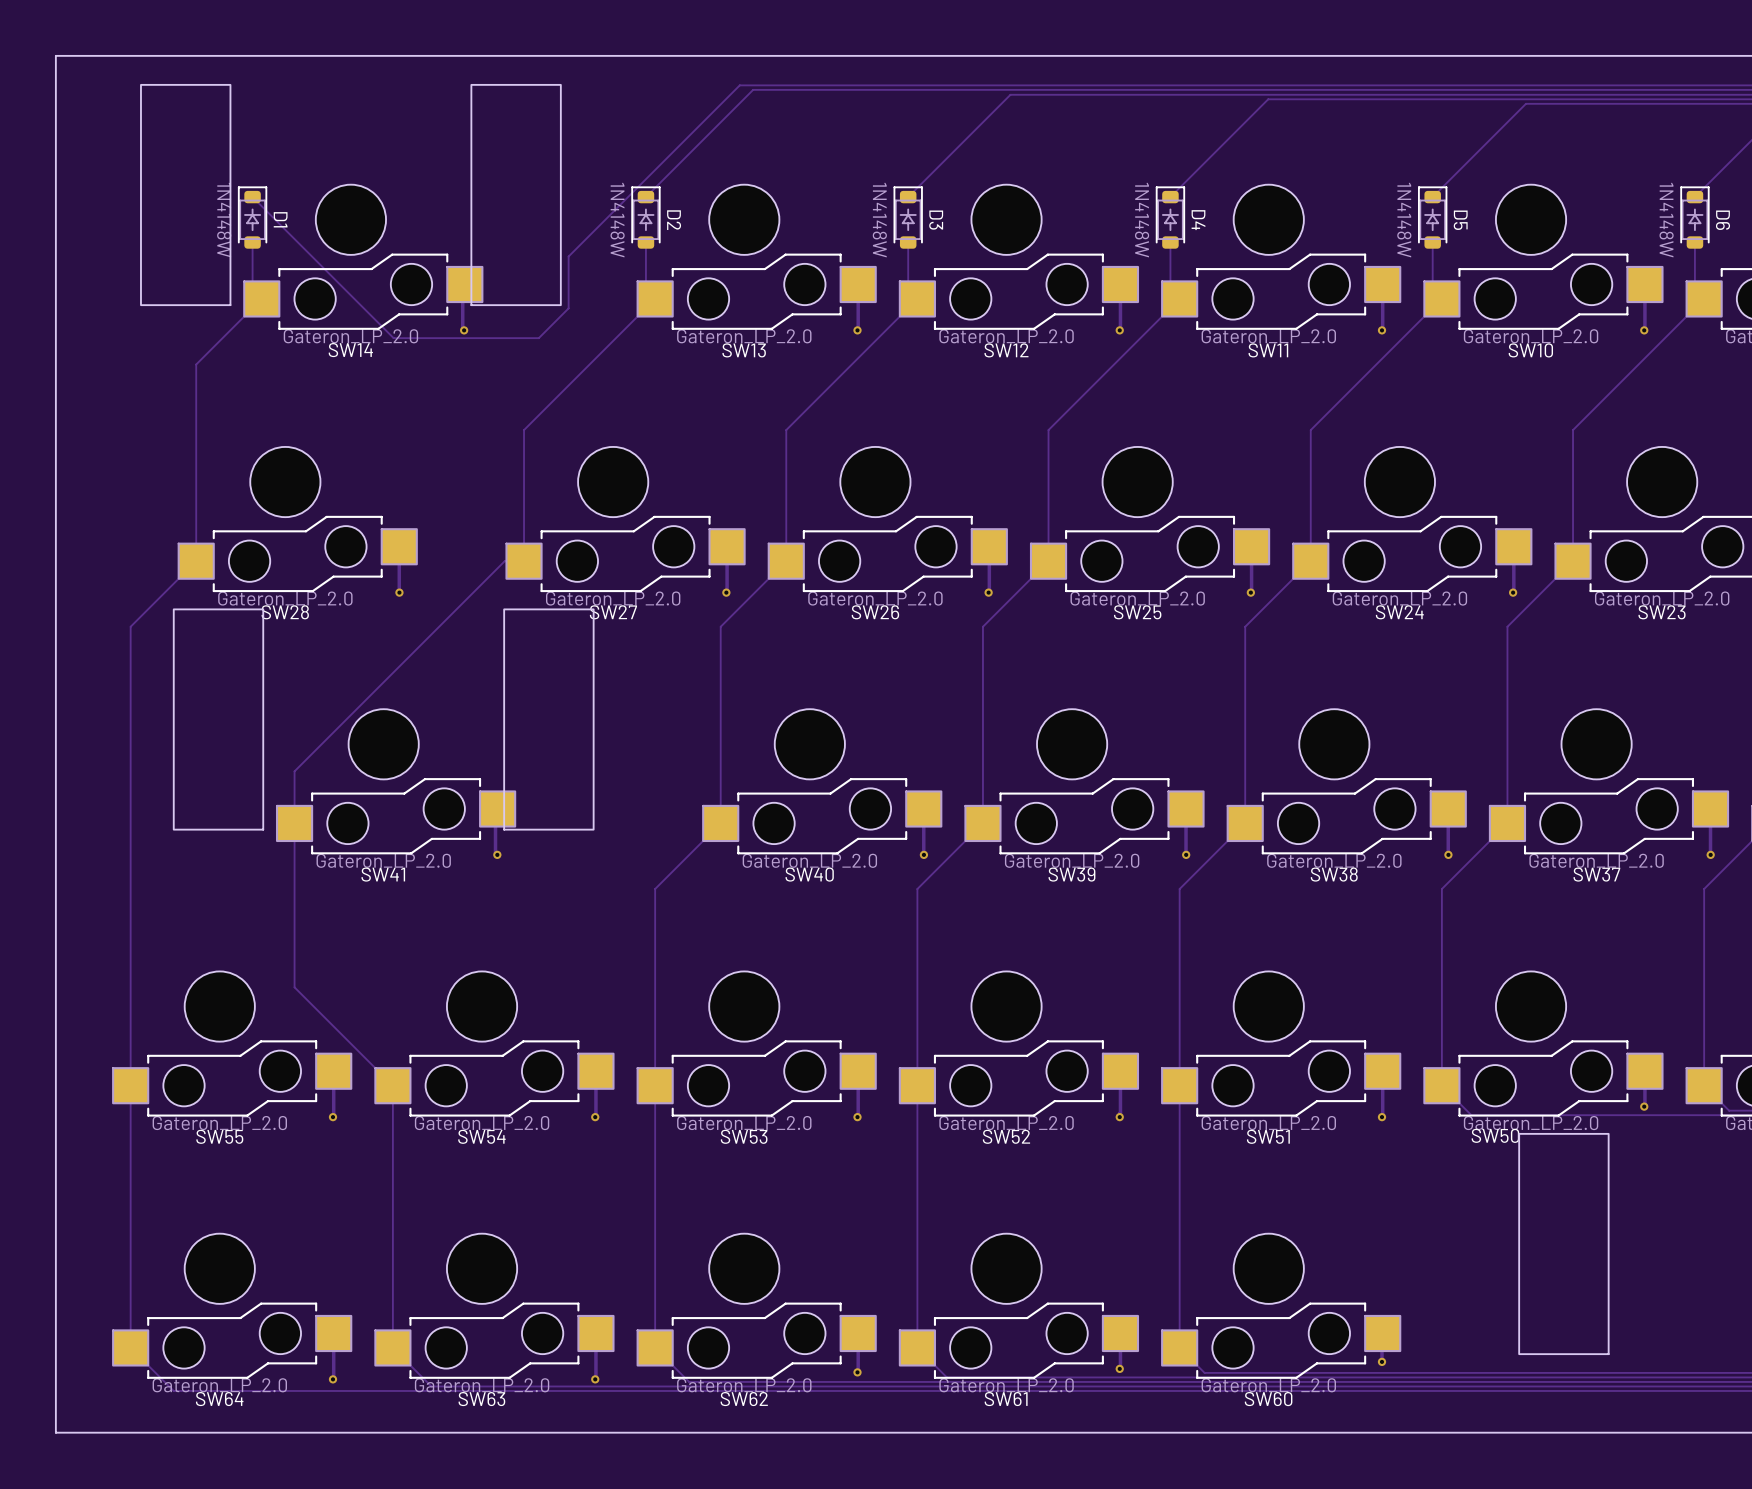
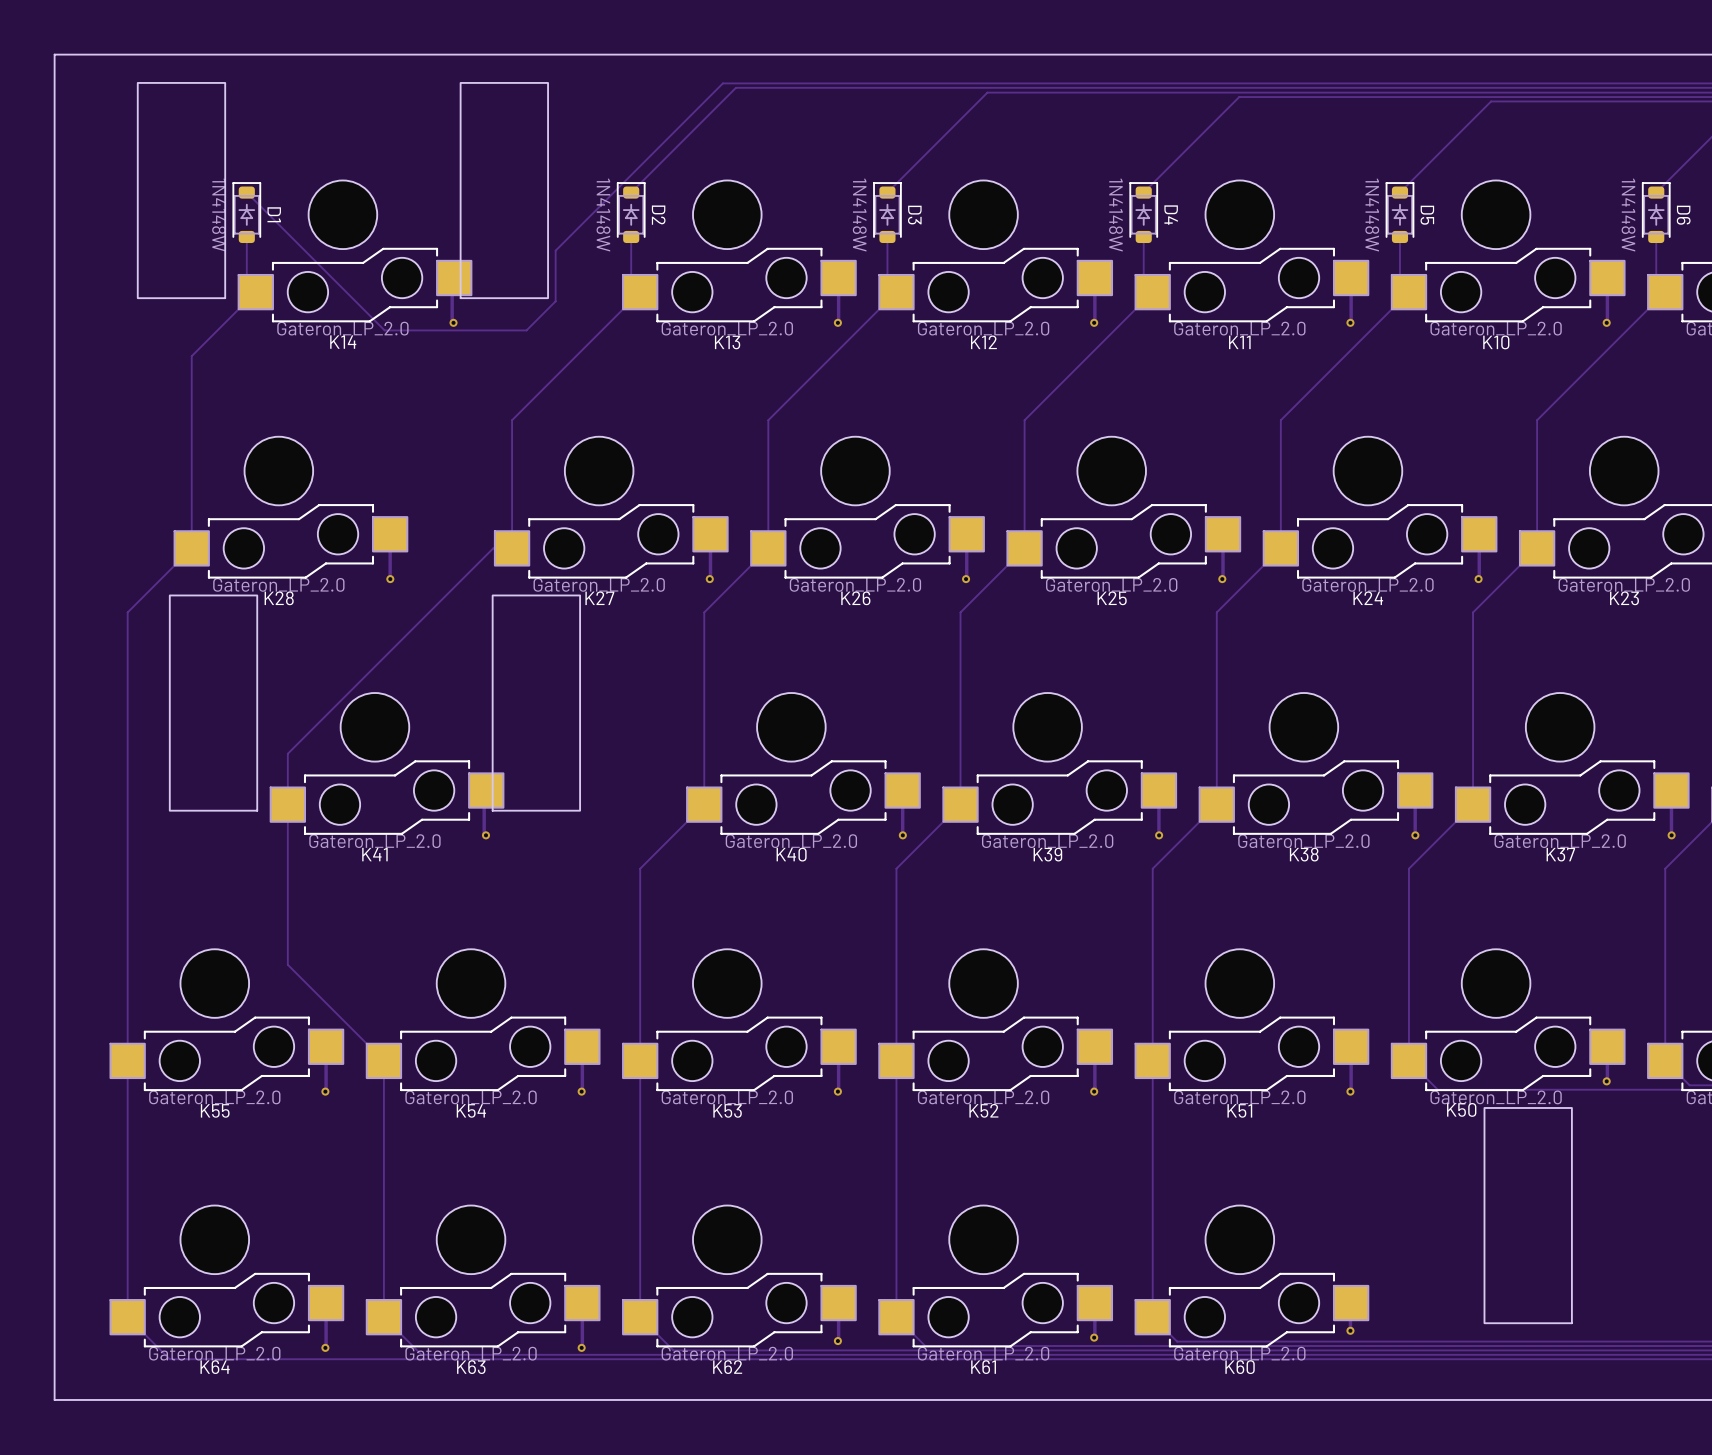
SW14 name: SW14 (350, 350) -> K14 (343, 342)
SW13 name: SW13 (744, 350) -> K13 (727, 342)
SW12 name: SW12 (1006, 350) -> K12 (983, 342)
SW11 name: SW11 (1268, 350) -> K11 (1239, 342)
SW10 name: SW10 (1530, 350) -> K10 (1496, 342)
SW28 name: SW28 (285, 612) -> K28 (279, 598)
SW27 name: SW27 (613, 612) -> K27 (599, 598)
SW26 name: SW26 (875, 612) -> K26 (855, 598)
SW25 name: SW25 (1137, 612) -> K25 (1112, 598)
SW24 name: SW24 (1399, 612) -> K24 (1368, 598)
SW23 name: SW23 (1662, 612) -> K23 (1624, 598)
SW41 name: SW41 (383, 874) -> K41 (374, 854)
SW40 name: SW40 (809, 874) -> K40 (791, 854)
SW39 name: SW39 (1071, 874) -> K39 (1047, 854)
SW38 name: SW38 (1334, 874) -> K38 (1304, 854)
SW37 name: SW37 (1596, 874) -> K37 (1560, 854)
SW50 name: SW50 (1495, 1135) -> K50 (1461, 1109)
SW55 name: SW55 (219, 1136) -> K55 (215, 1110)
SW54 name: SW54 (481, 1136) -> K54 (471, 1110)
SW53 name: SW53 (744, 1136) -> K53 (727, 1110)
SW52 name: SW52 (1006, 1136) -> K52 (983, 1110)
SW51 name: SW51 (1268, 1136) -> K51 (1239, 1110)
SW64 name: SW64 (219, 1399) -> K64 (215, 1367)
SW63 name: SW63 (481, 1399) -> K63 (471, 1367)
SW62 name: SW62 (744, 1399) -> K62 (727, 1367)
SW61 name: SW61 (1006, 1399) -> K61 (983, 1367)
SW60 name: SW60 (1268, 1399) -> K60 (1240, 1367)

